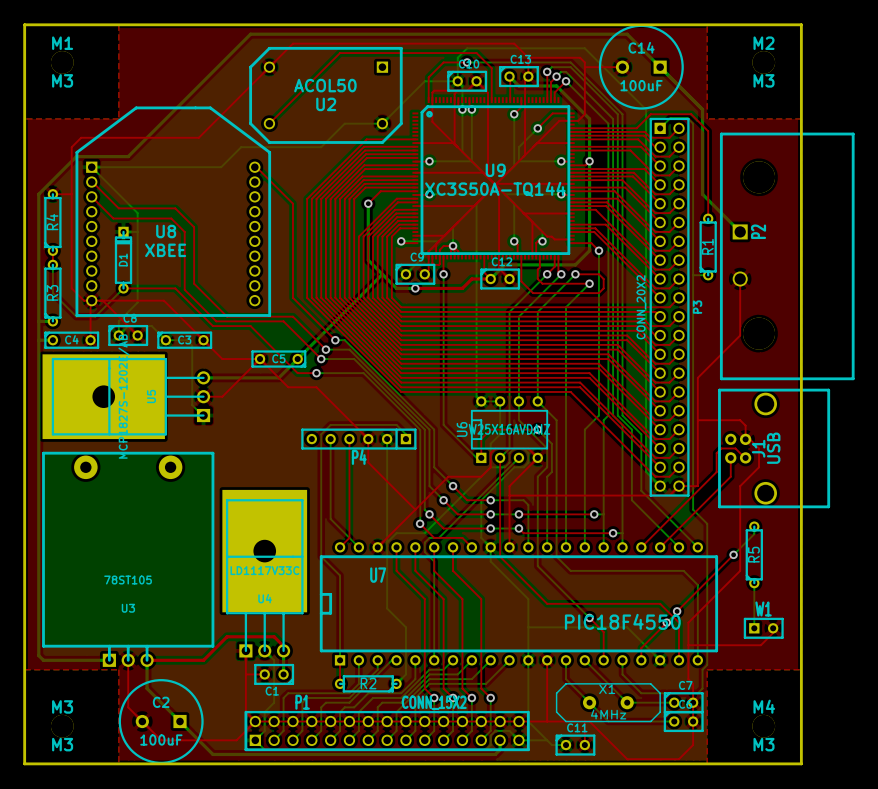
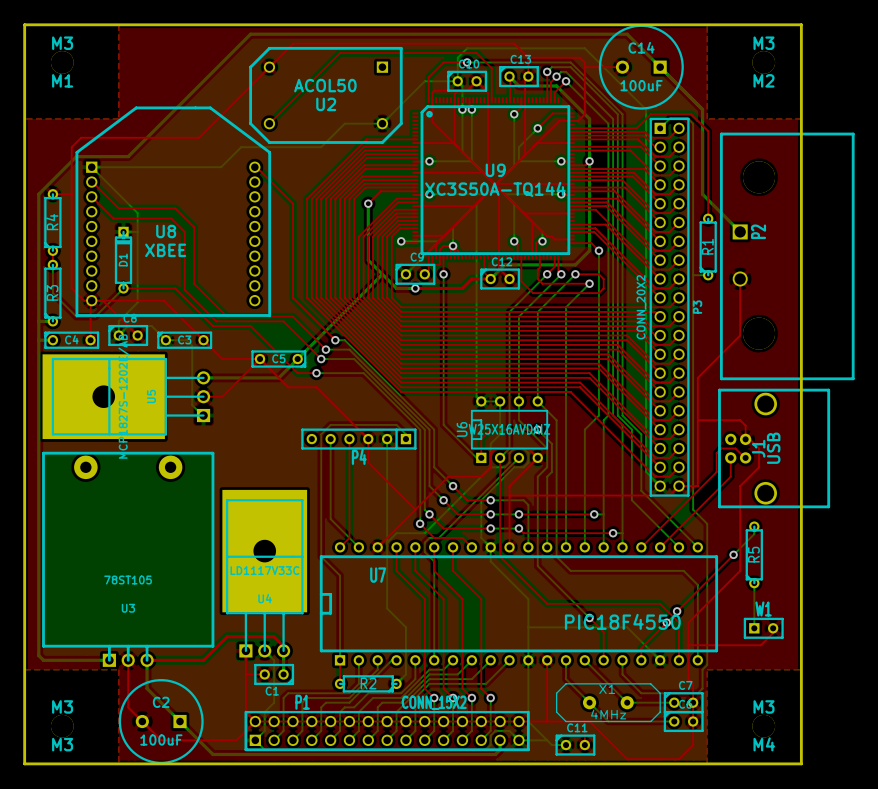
M1 name: M1 (62, 43) -> M3 (62, 43)
M2 name: M2 (764, 43) -> M3 (764, 43)
M1 value: M3 (62, 80) -> M1 (62, 80)
M2 value: M3 (764, 80) -> M2 (764, 80)
M4 name: M4 (764, 706) -> M3 (764, 706)
M4 value: M3 (764, 744) -> M4 (764, 744)

